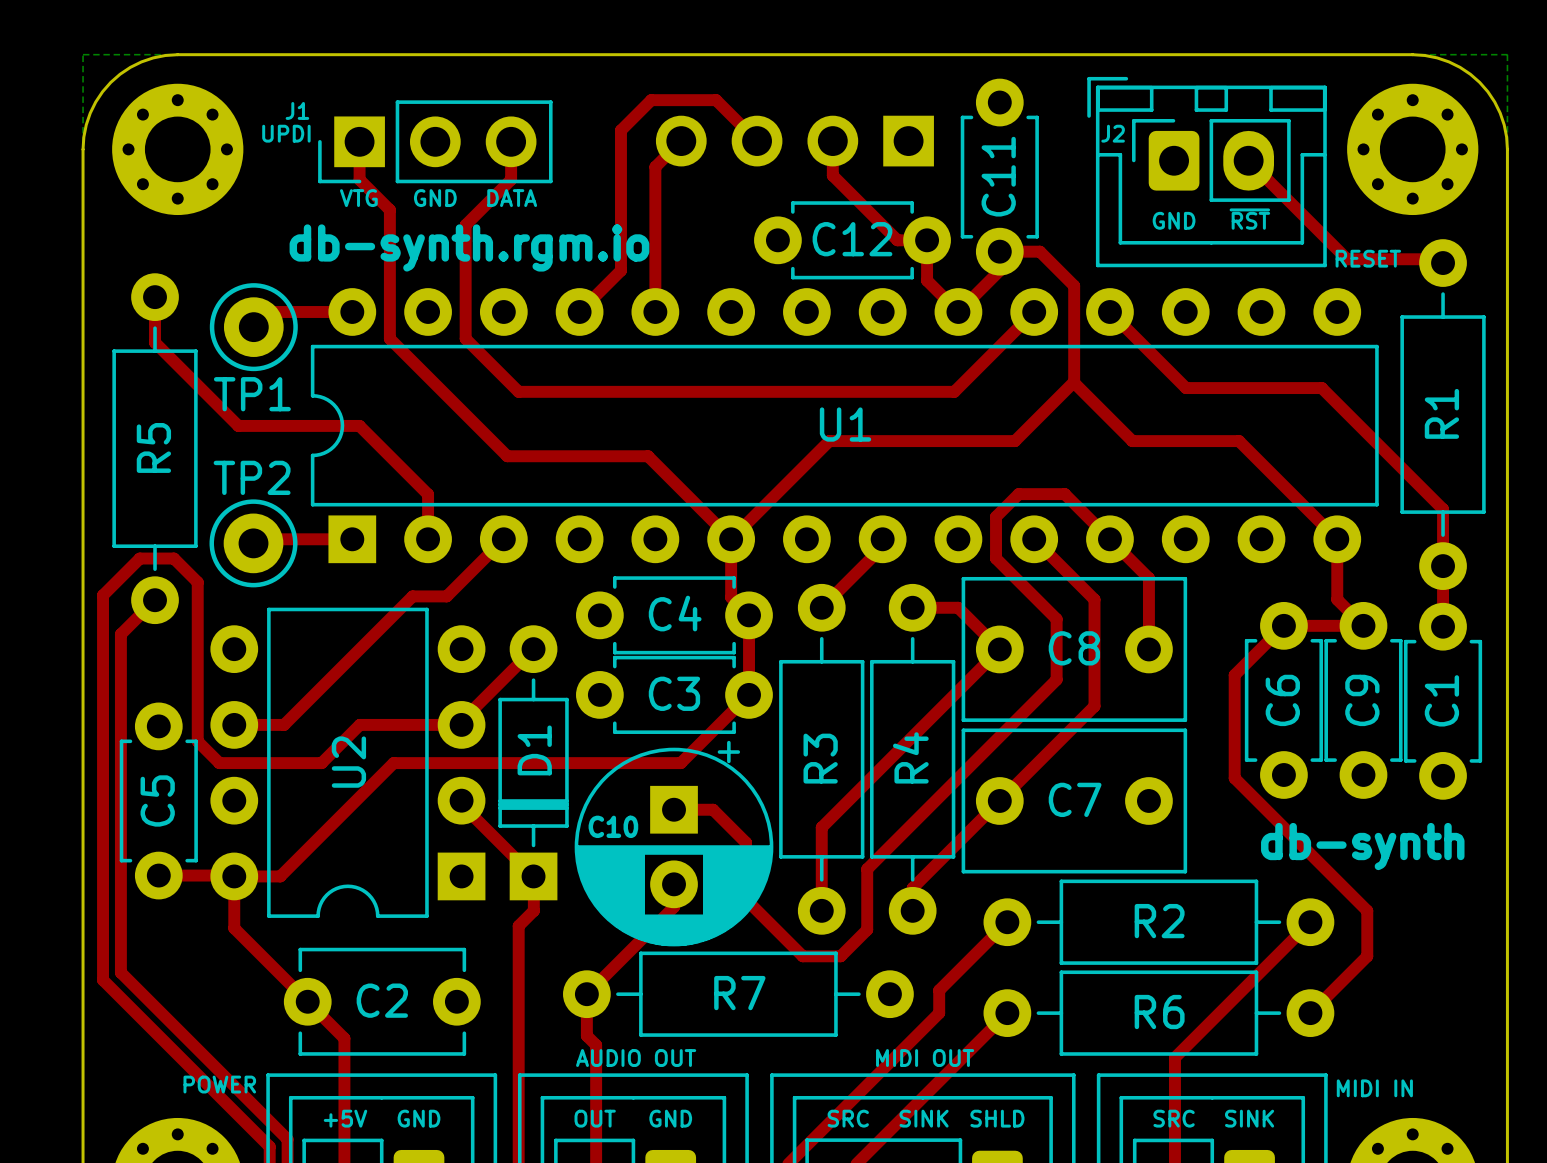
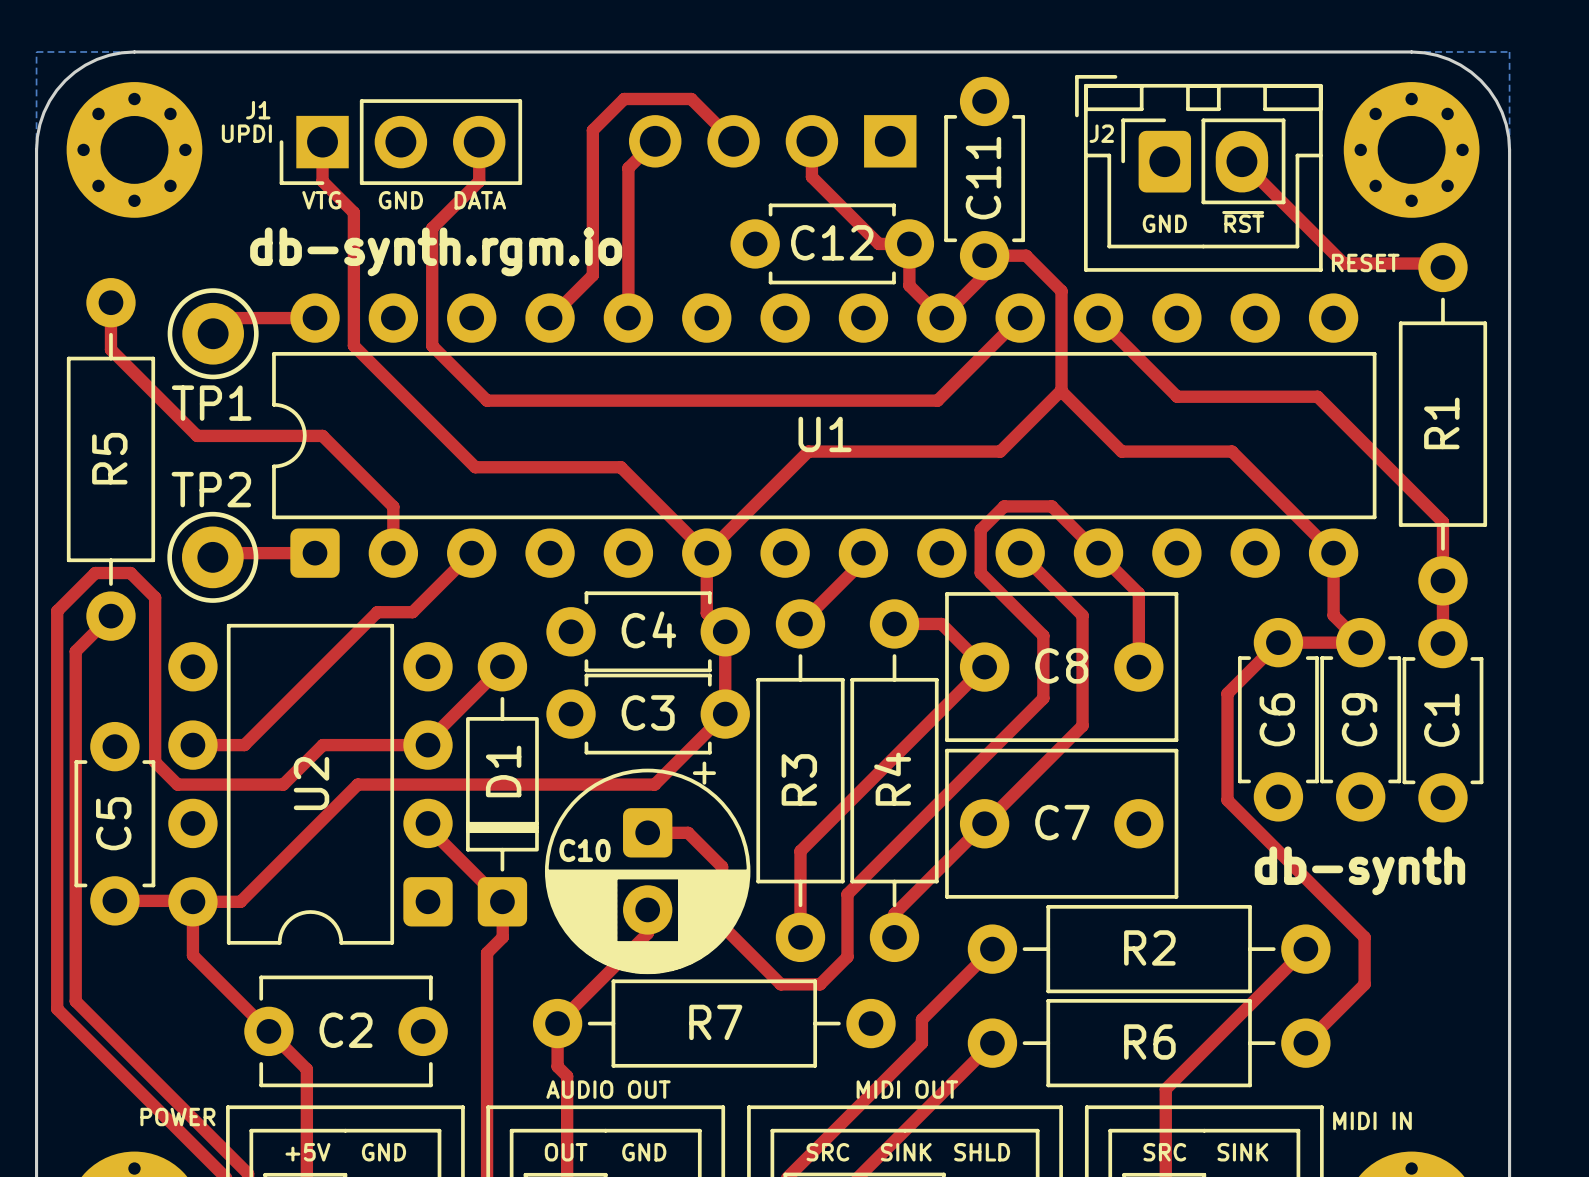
U1 footprint: [310, 288, 1379, 564] -> [272, 293, 1377, 578]
U2 footprint: [210, 607, 486, 918] -> [168, 623, 453, 945]
D1 footprint: [498, 625, 569, 901] -> [466, 642, 539, 927]
C10 footprint: [574, 740, 774, 947] -> [544, 761, 751, 975]

